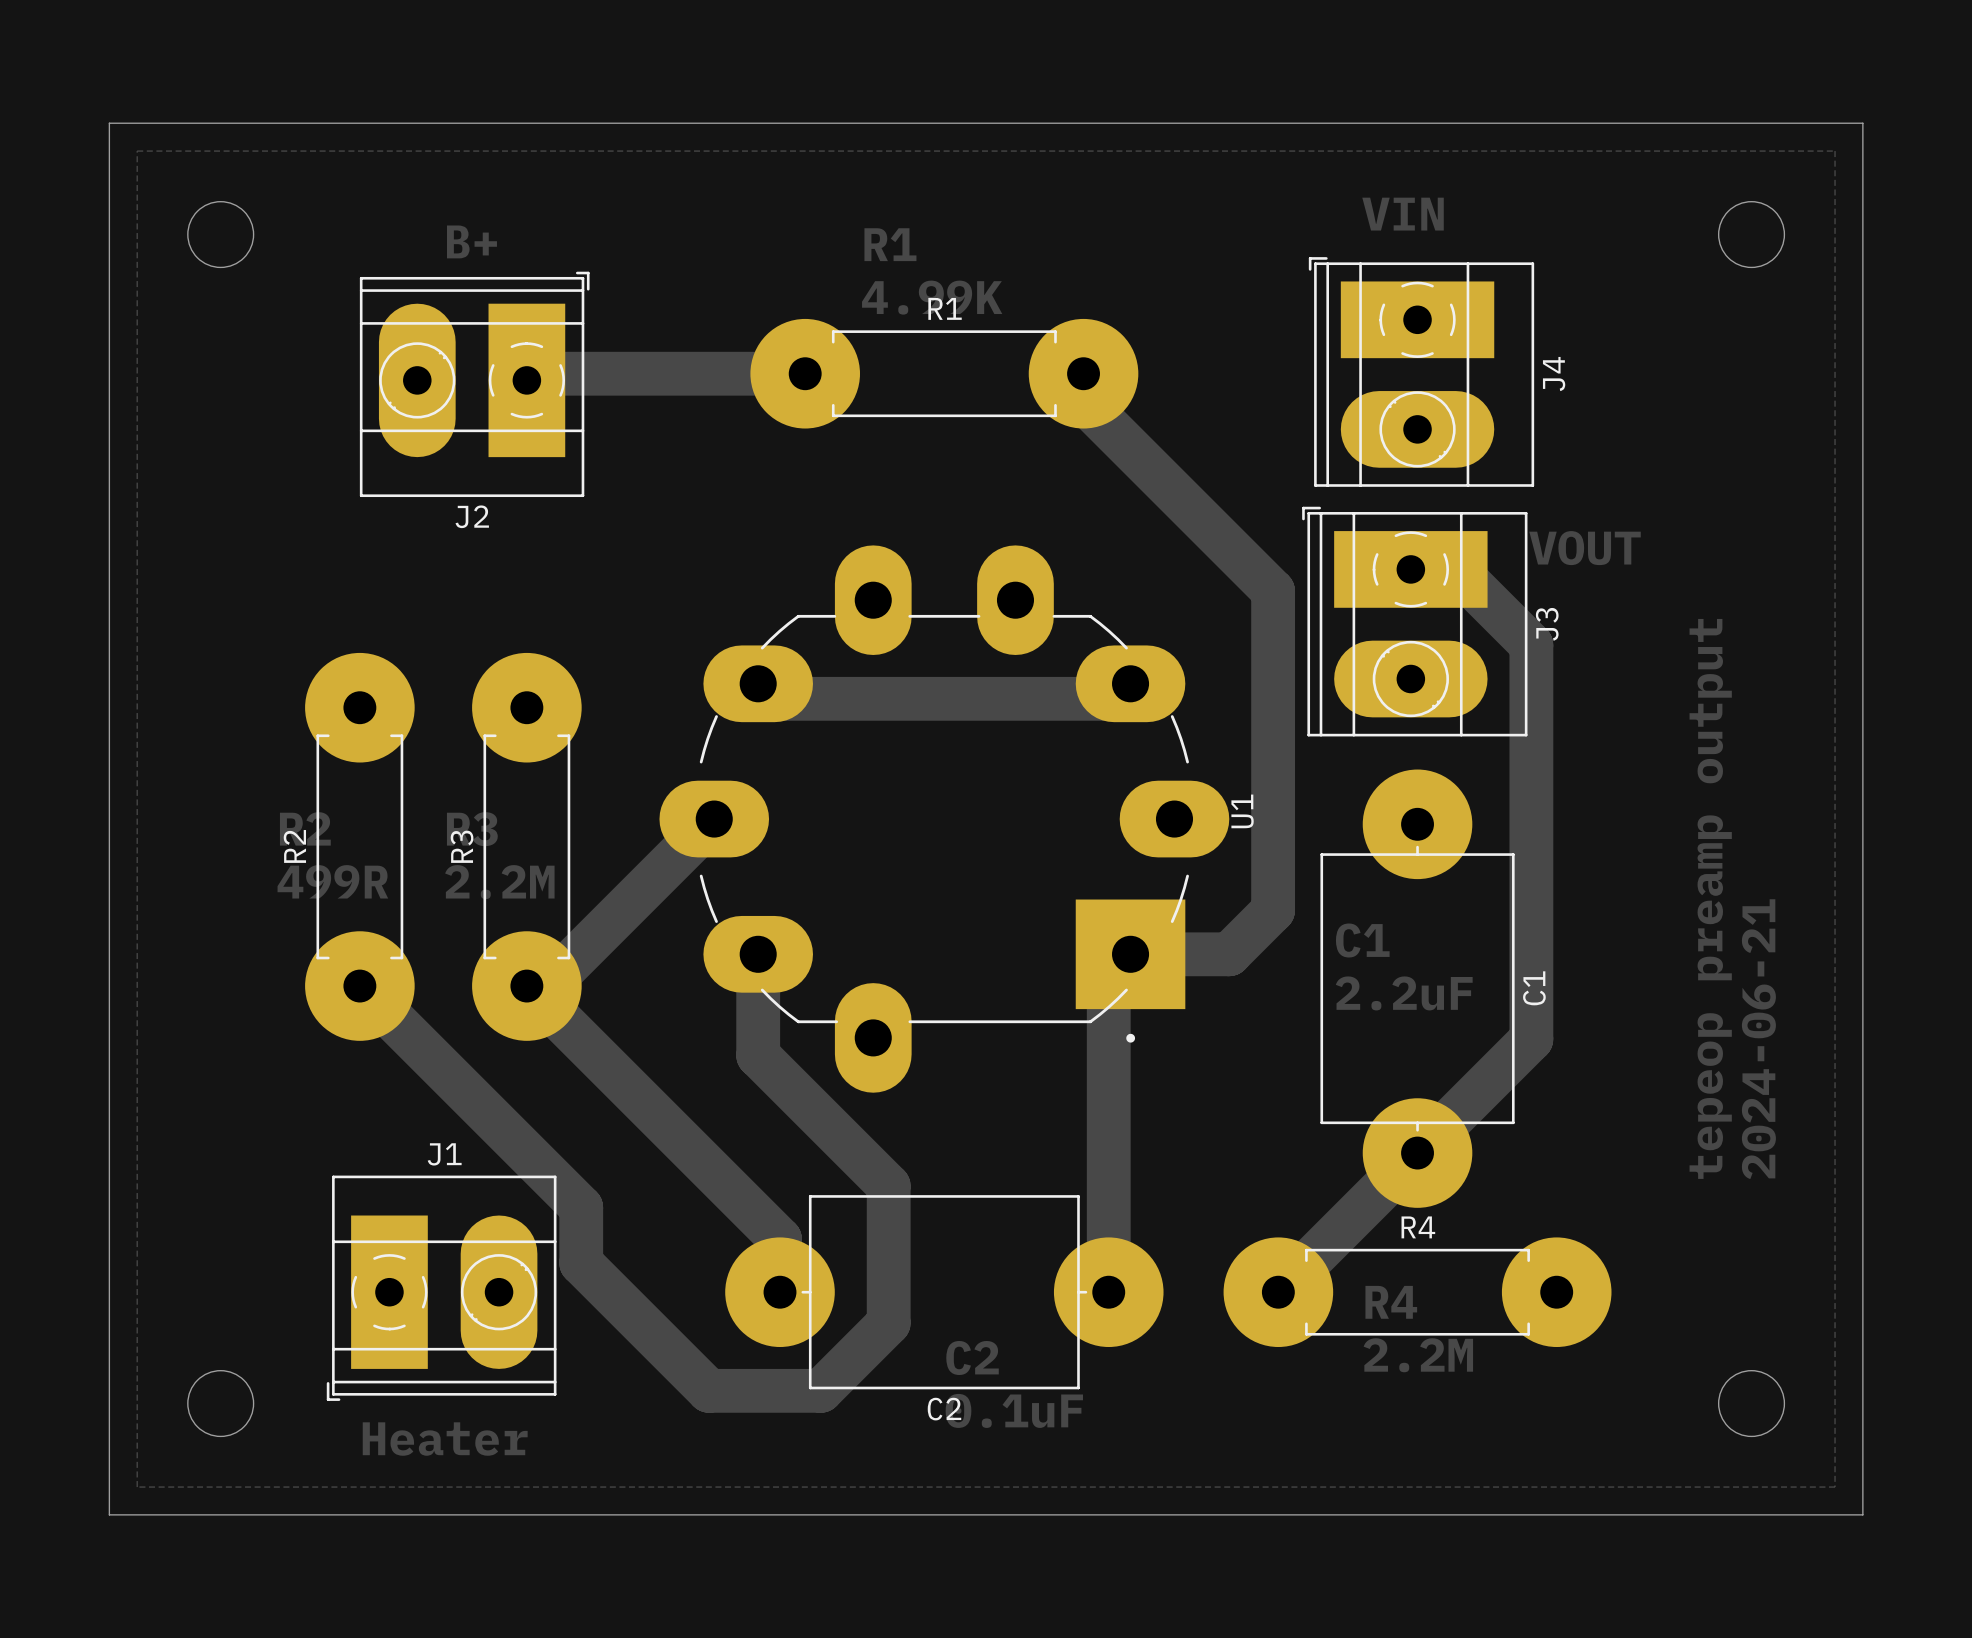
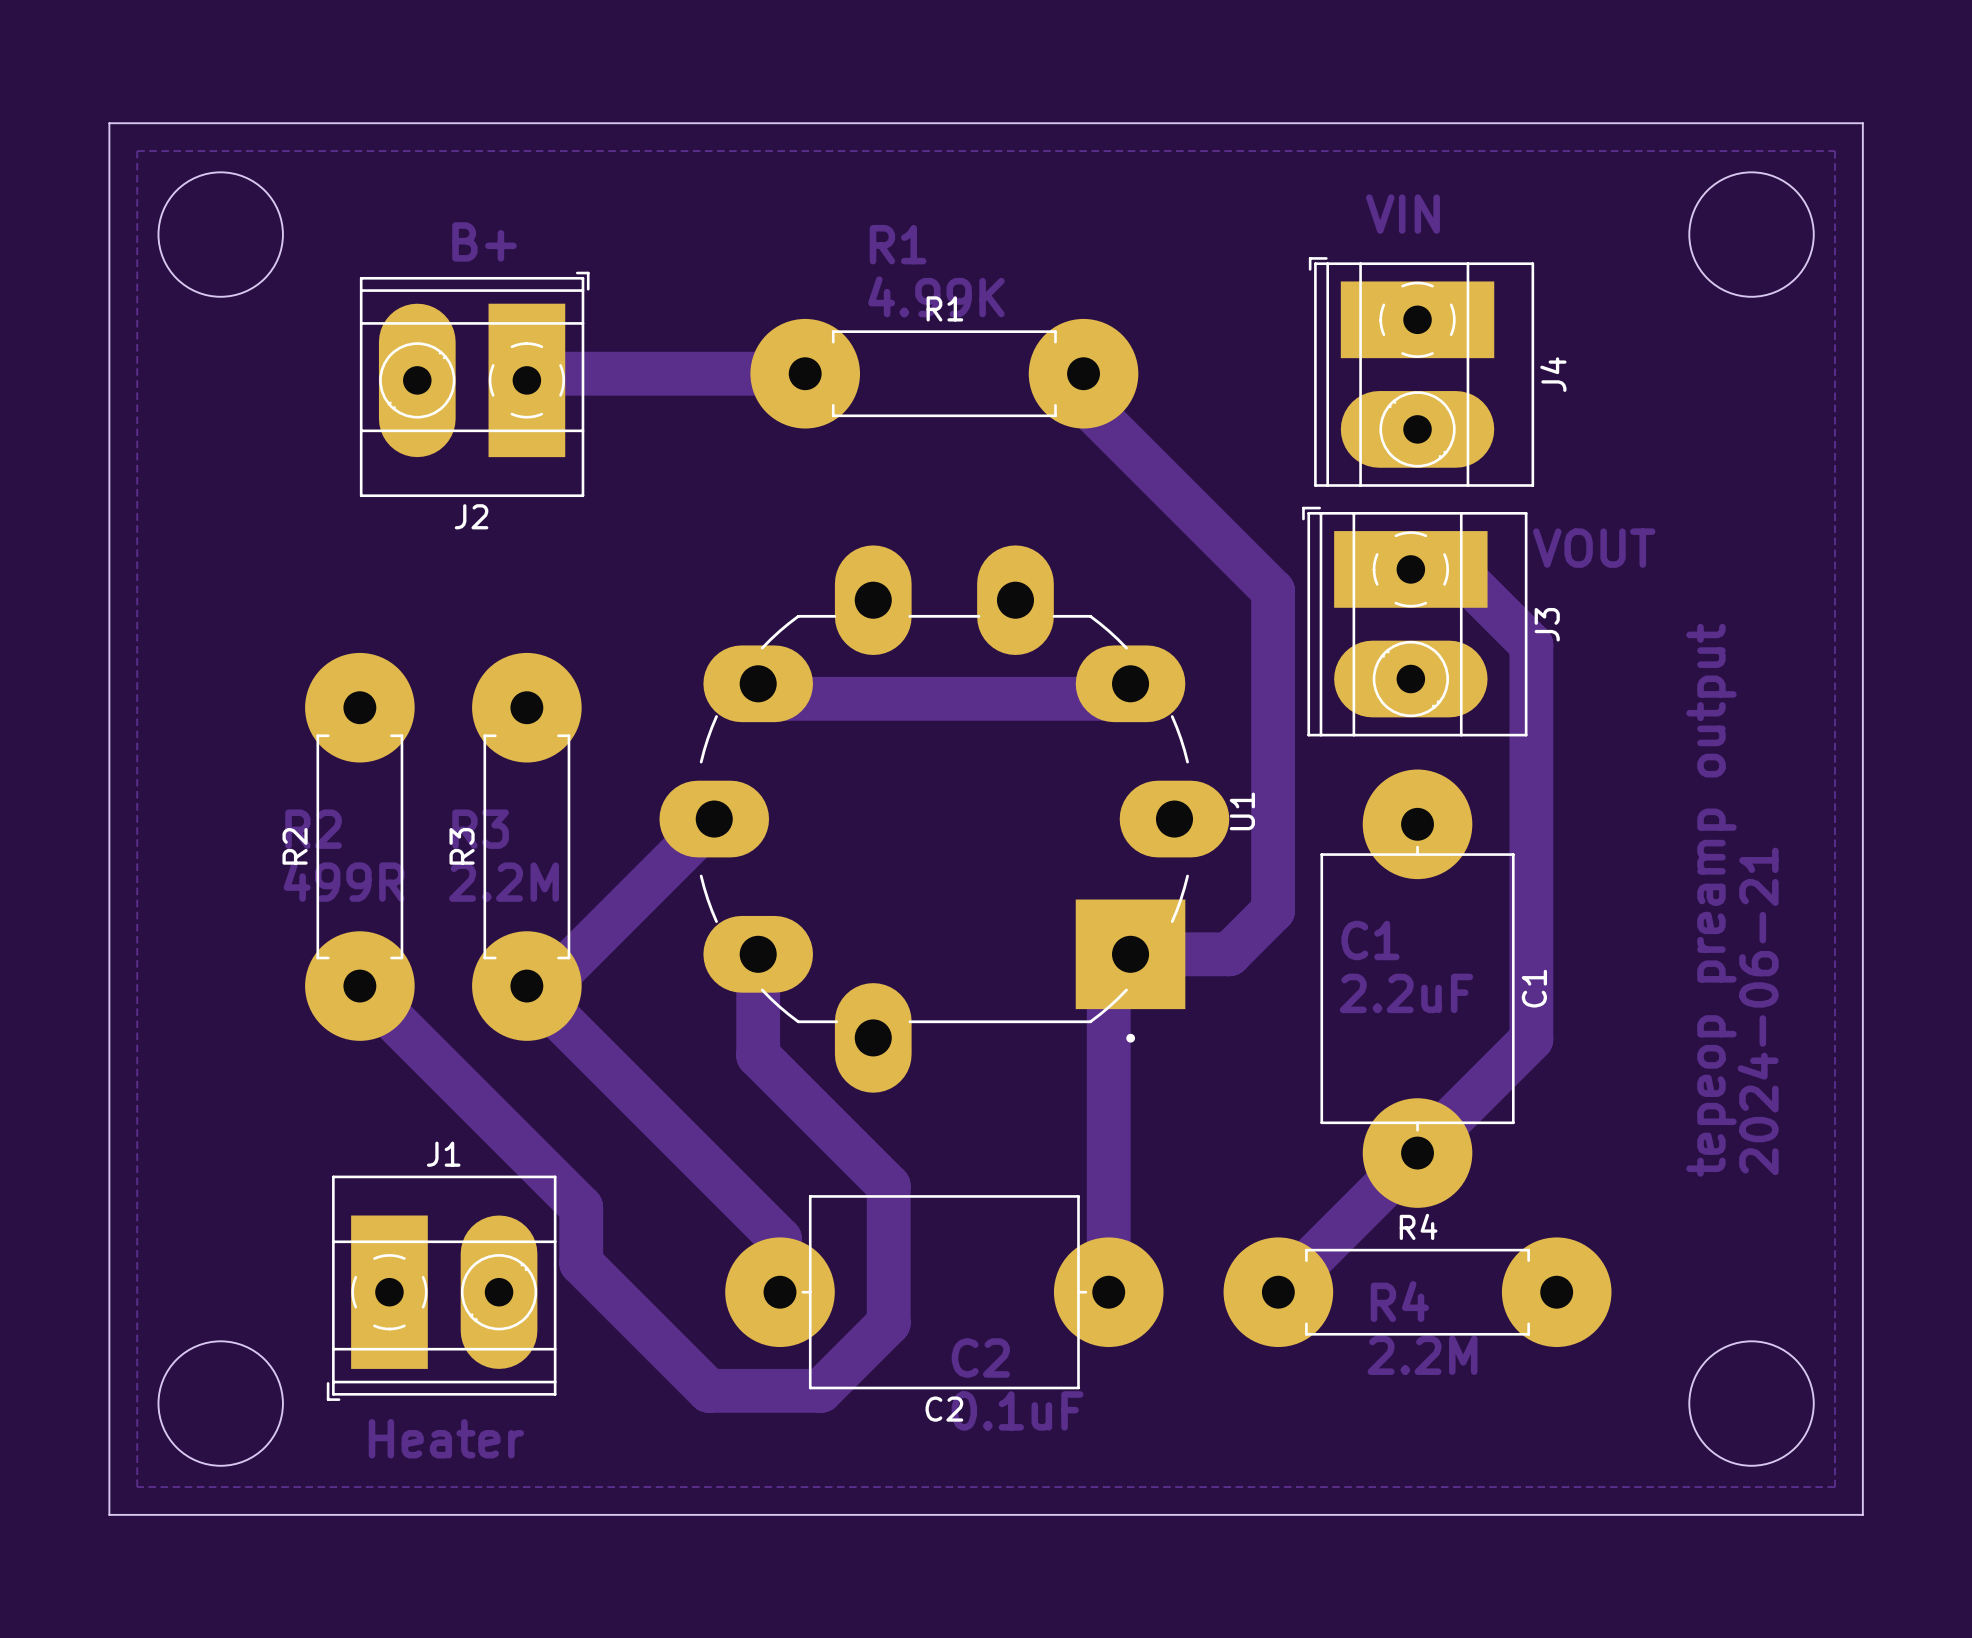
round board edge size: [187, 201, 255, 268] -> [157, 171, 284, 298]
round board edge size: [1718, 201, 1785, 268] -> [1688, 171, 1815, 298]
round board edge size: [187, 1370, 255, 1437] -> [157, 1340, 284, 1467]
round board edge size: [1718, 1370, 1785, 1437] -> [1688, 1340, 1815, 1467]

